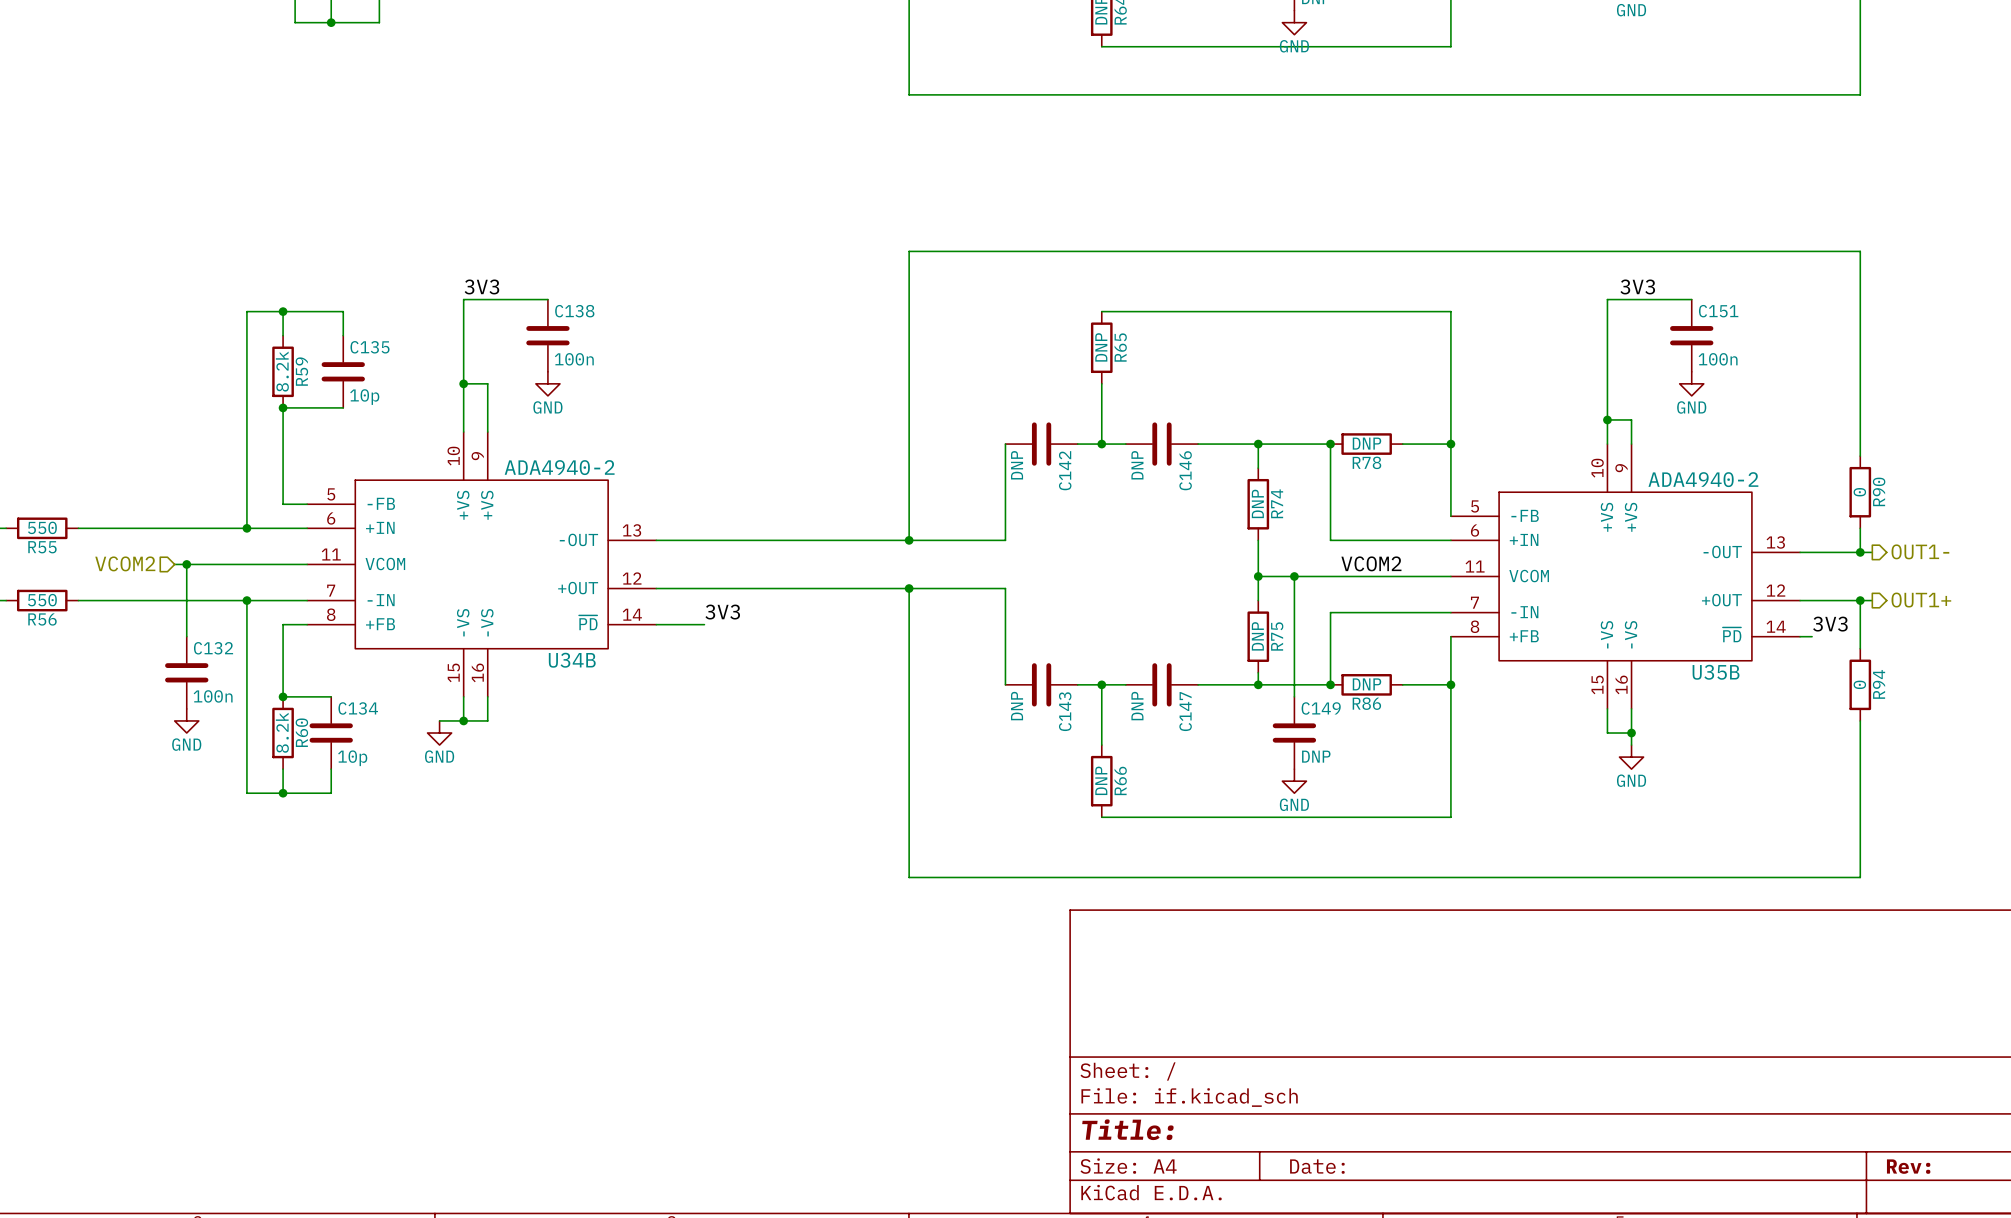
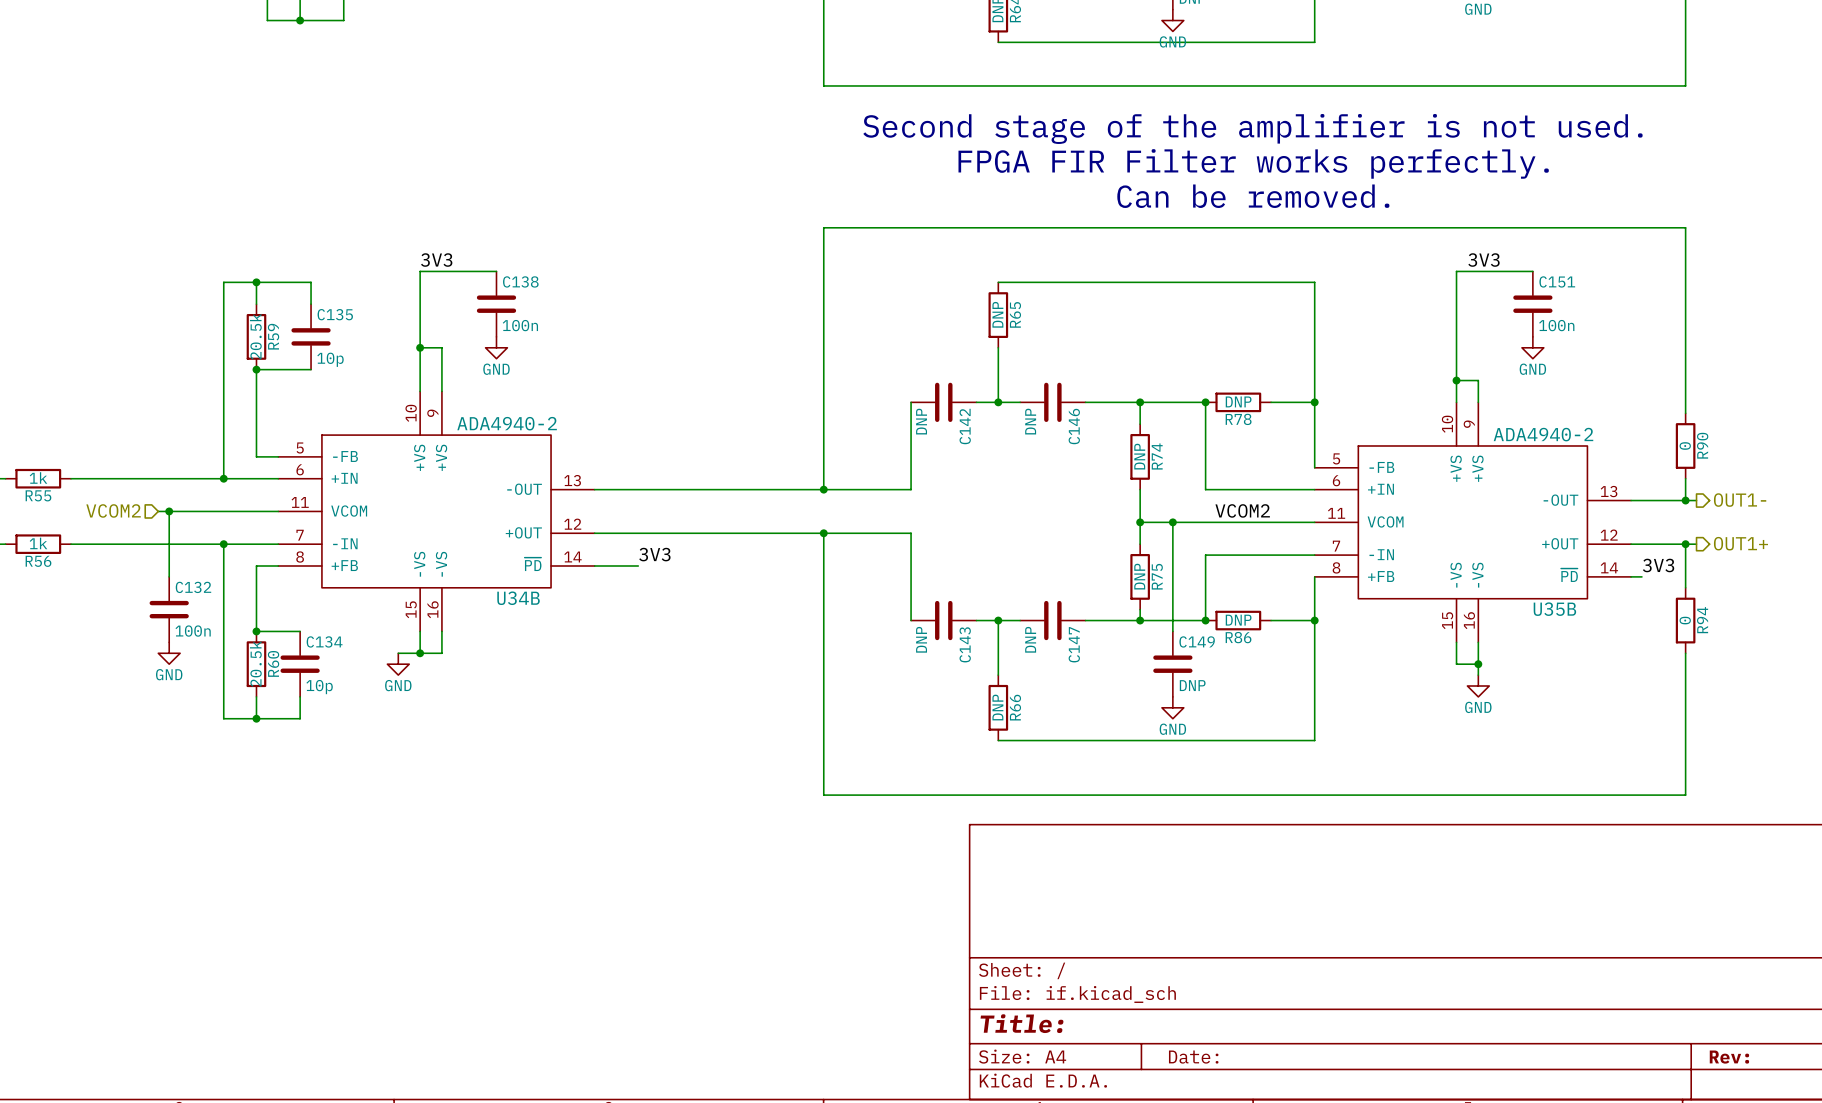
text: none -> Second stage of the amplifier is not used. (1252, 128)
text: none -> FPGA FIR Filter works perfectly. (1253, 163)
text: none -> Can be removed. (1253, 196)
R59 value: 8.2k (282, 371) -> 20.5k (255, 336)
R55 value: 550 (42, 527) -> 1k (38, 477)
R56 value: 550 (42, 600) -> 1k (38, 543)
R60 value: 8.2k (282, 732) -> 20.5k (255, 663)

